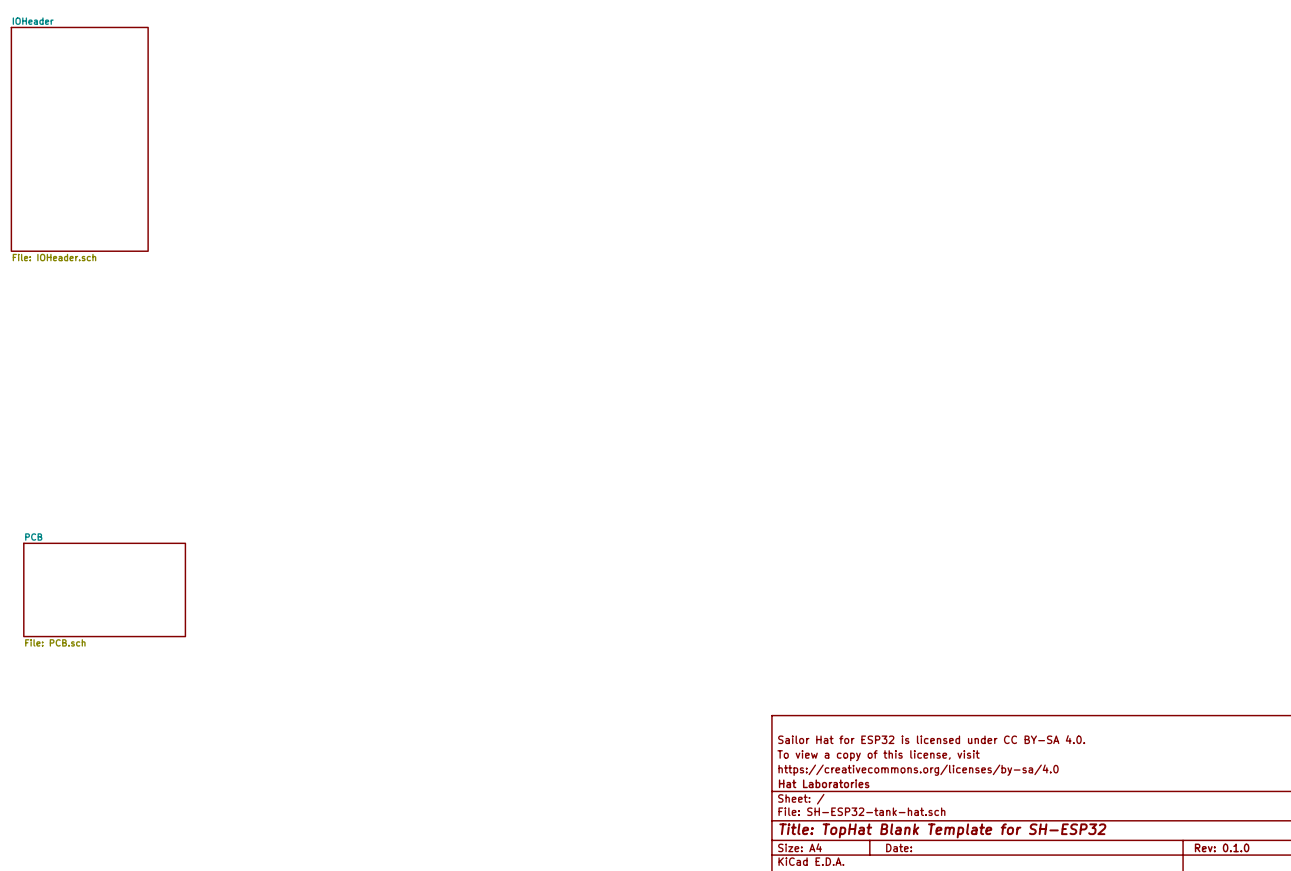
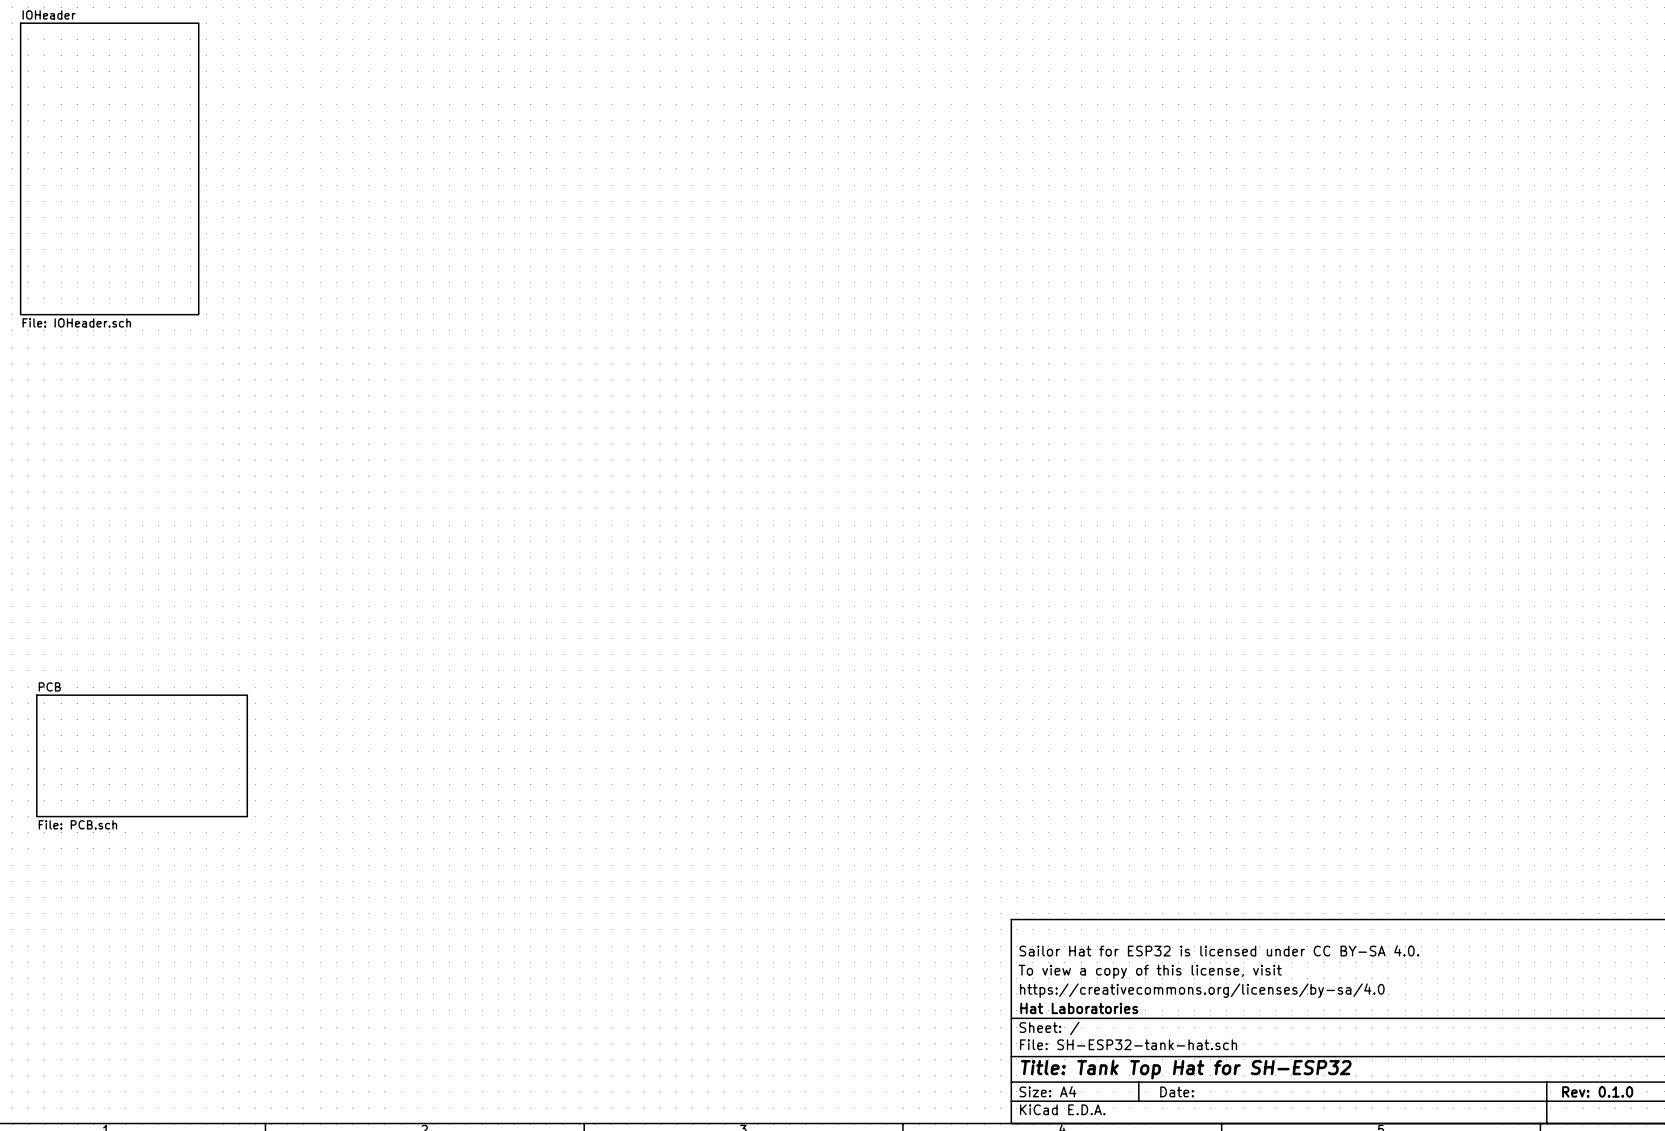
title block: Title: TopHat Blank Template for SH-ESP32 (942, 830) -> Title: Tank Top Hat for SH-ESP32 (1186, 1069)

